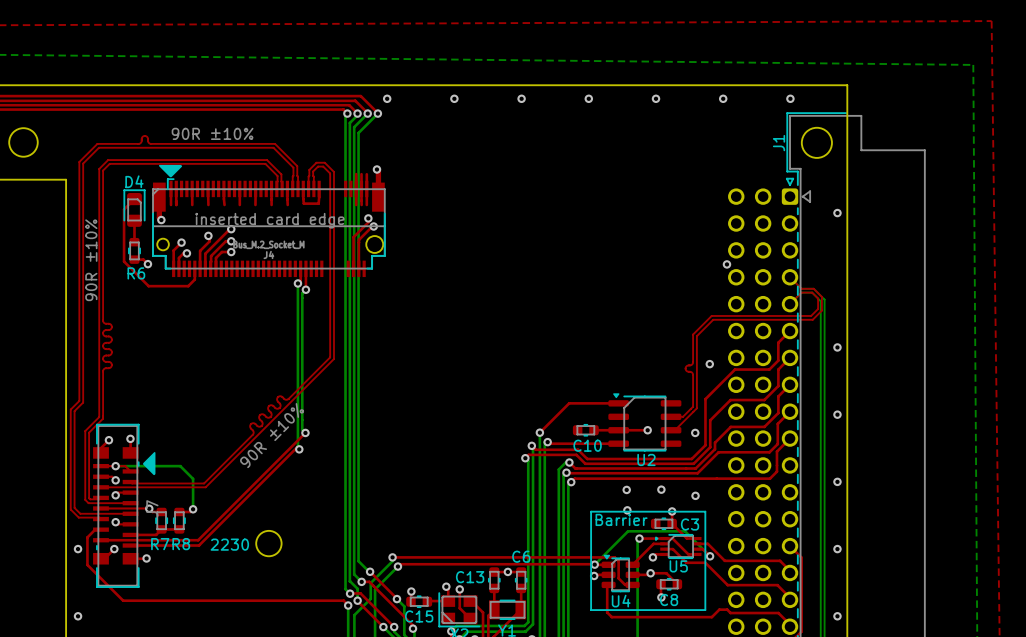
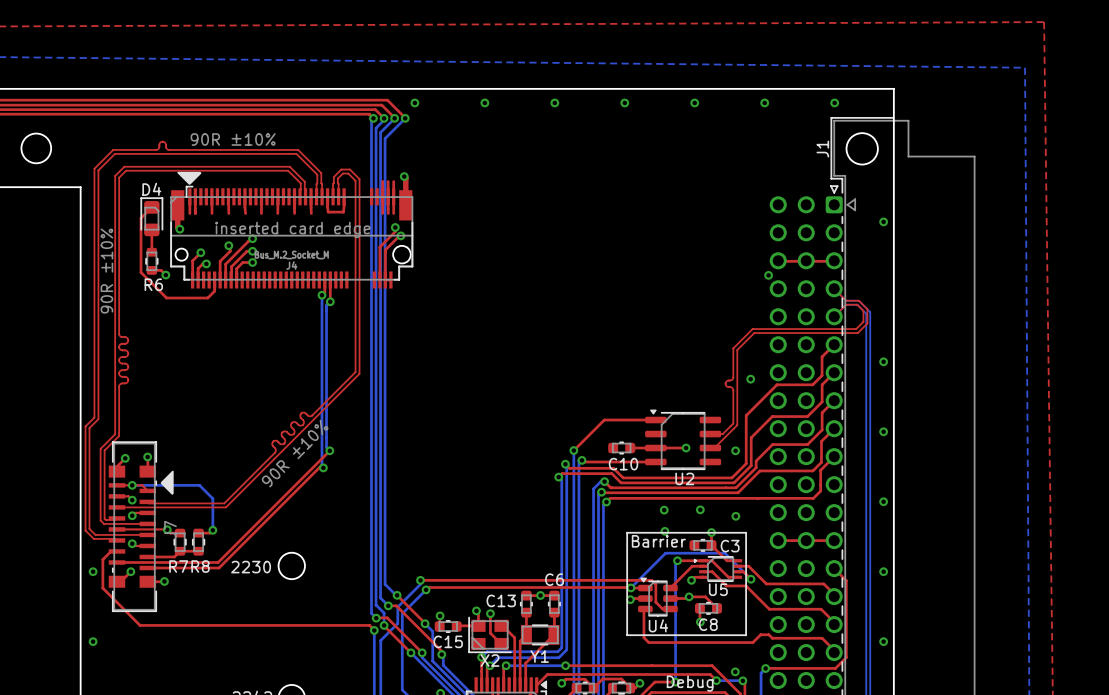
top track: none -> (781, 261) (837, 261)
top track: none -> (778, 540) (834, 540)

